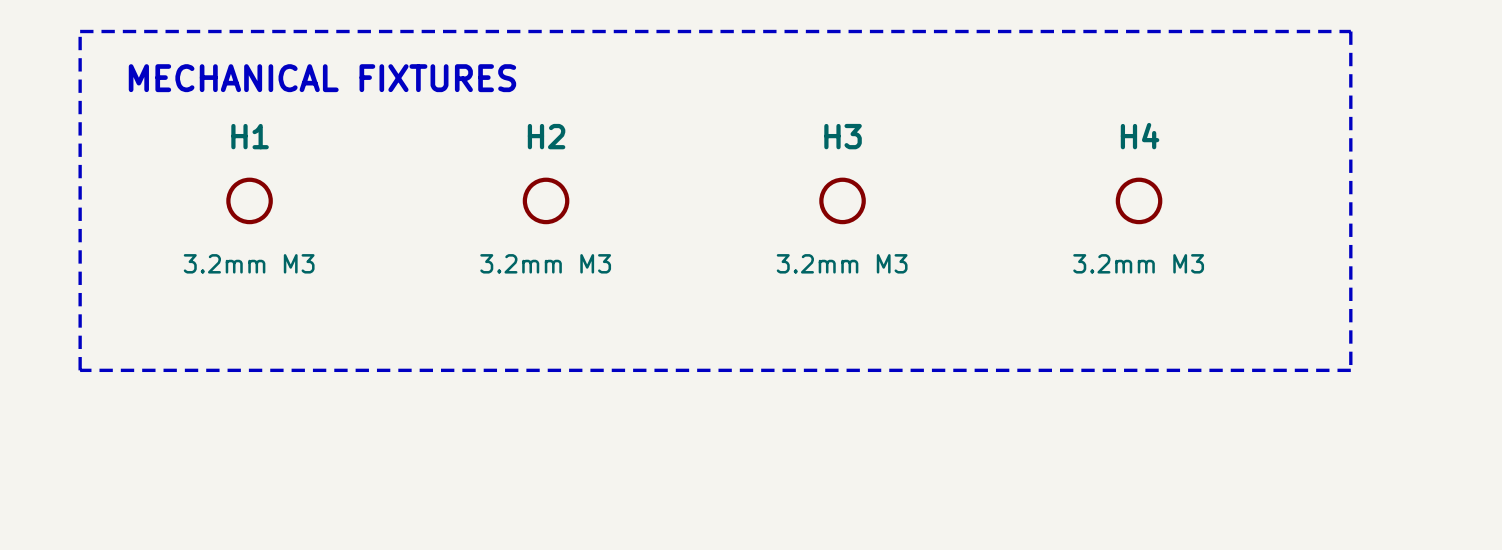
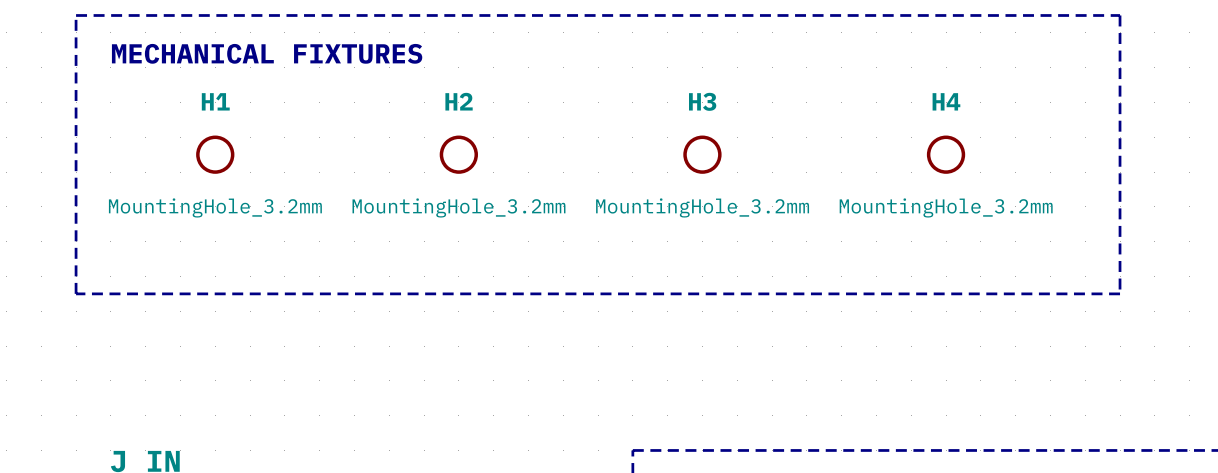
H1 value: 3.2mm M3 (249, 263) -> MountingHole_3.2mm (215, 207)
H2 value: 3.2mm M3 (545, 263) -> MountingHole_3.2mm (458, 207)
H3 value: 3.2mm M3 (842, 263) -> MountingHole_3.2mm (702, 207)
H4 value: 3.2mm M3 (1138, 263) -> MountingHole_3.2mm (946, 207)

